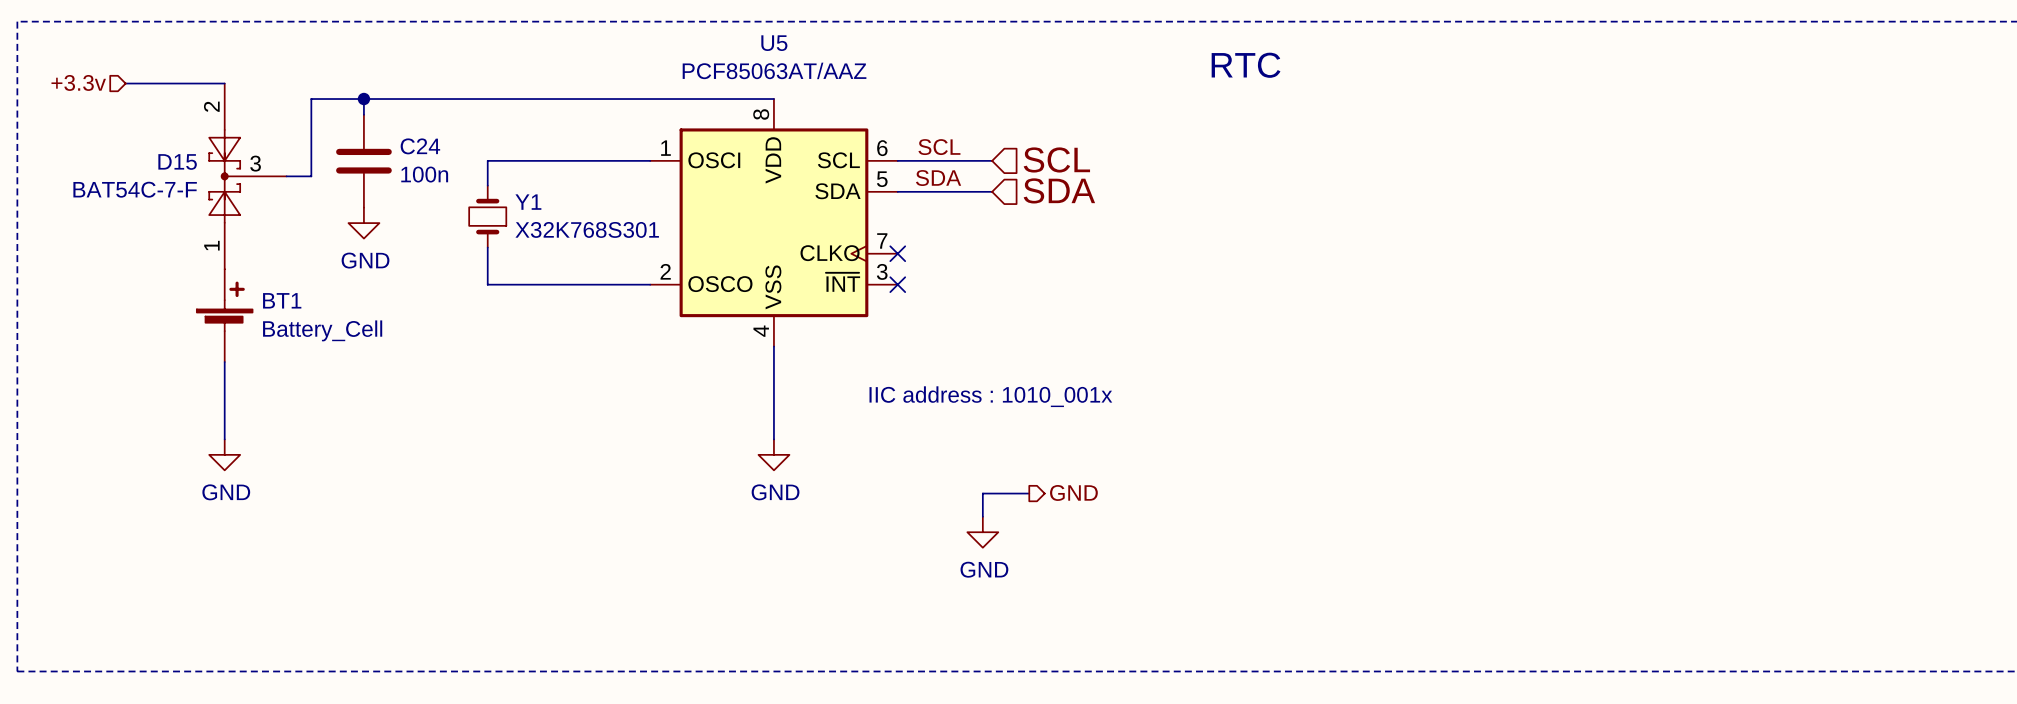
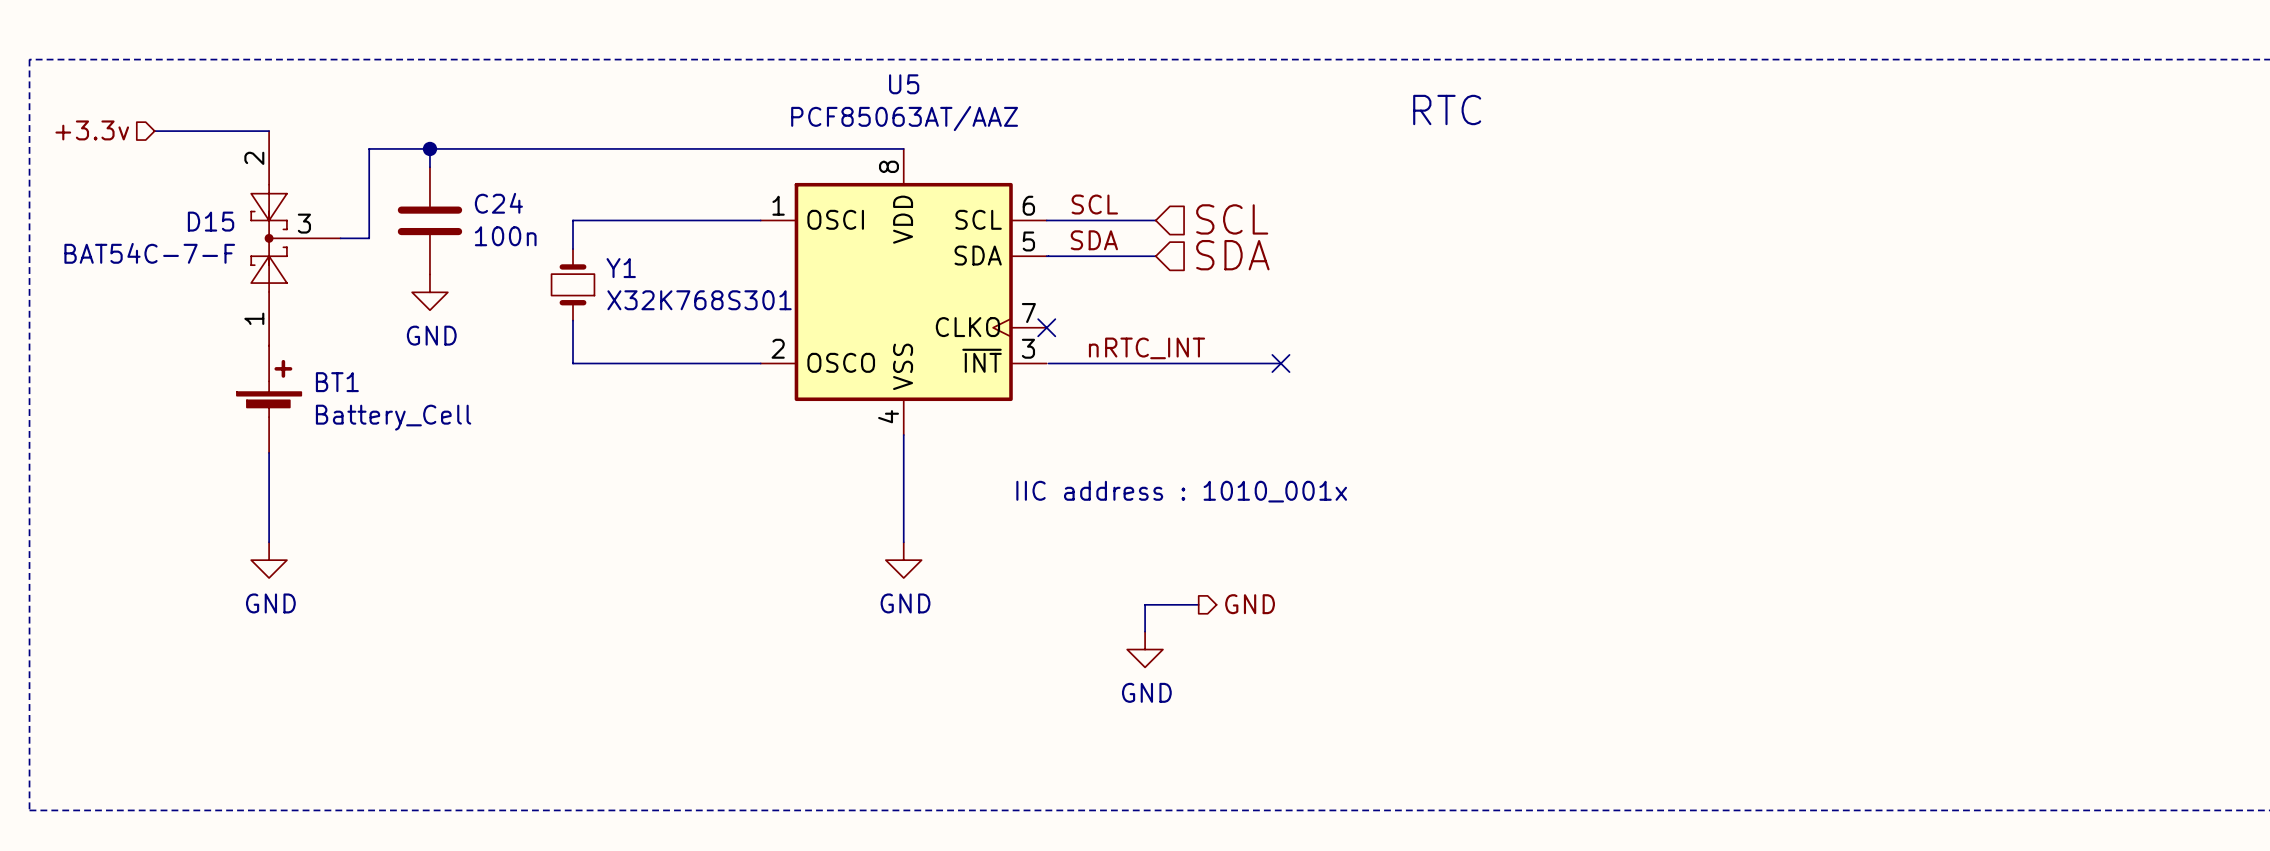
label: none -> nRTC_INT (1146, 348)
no-connect mark: (897, 284) -> none
wire: none -> (1048, 363) (1280, 363)
no-connect mark: none -> (1280, 363)

